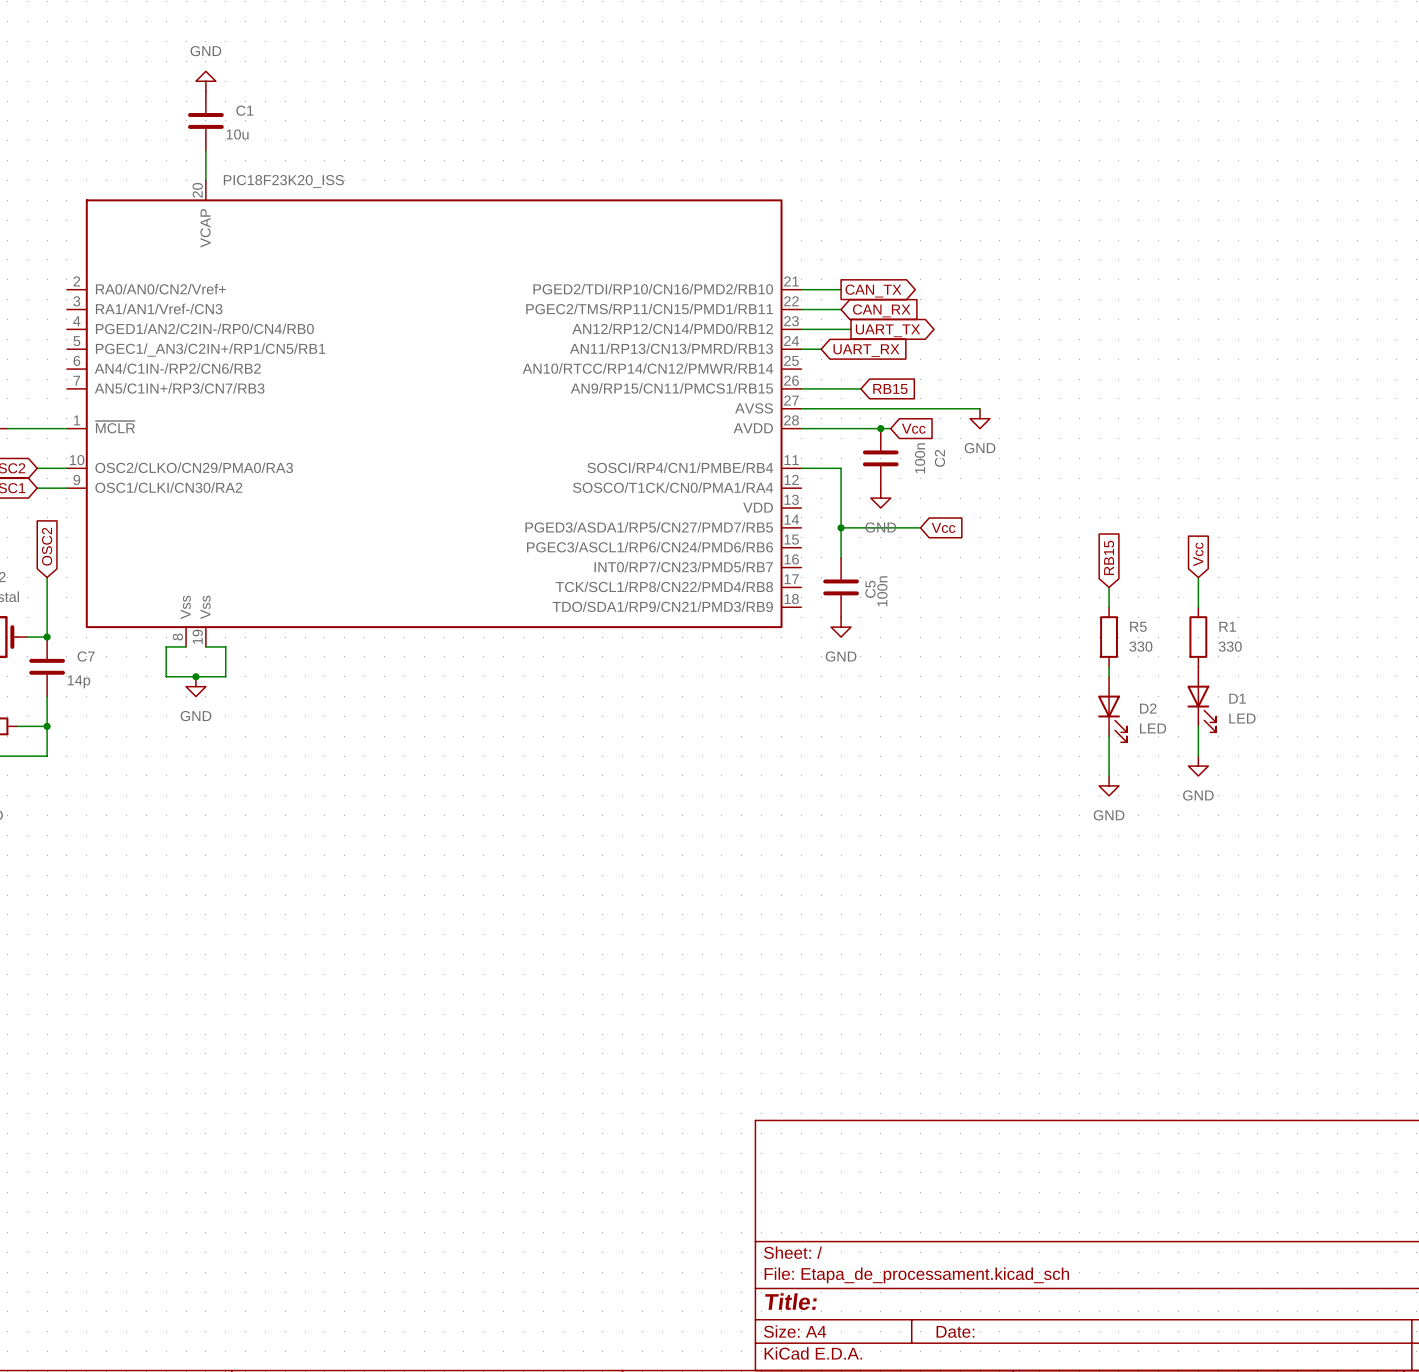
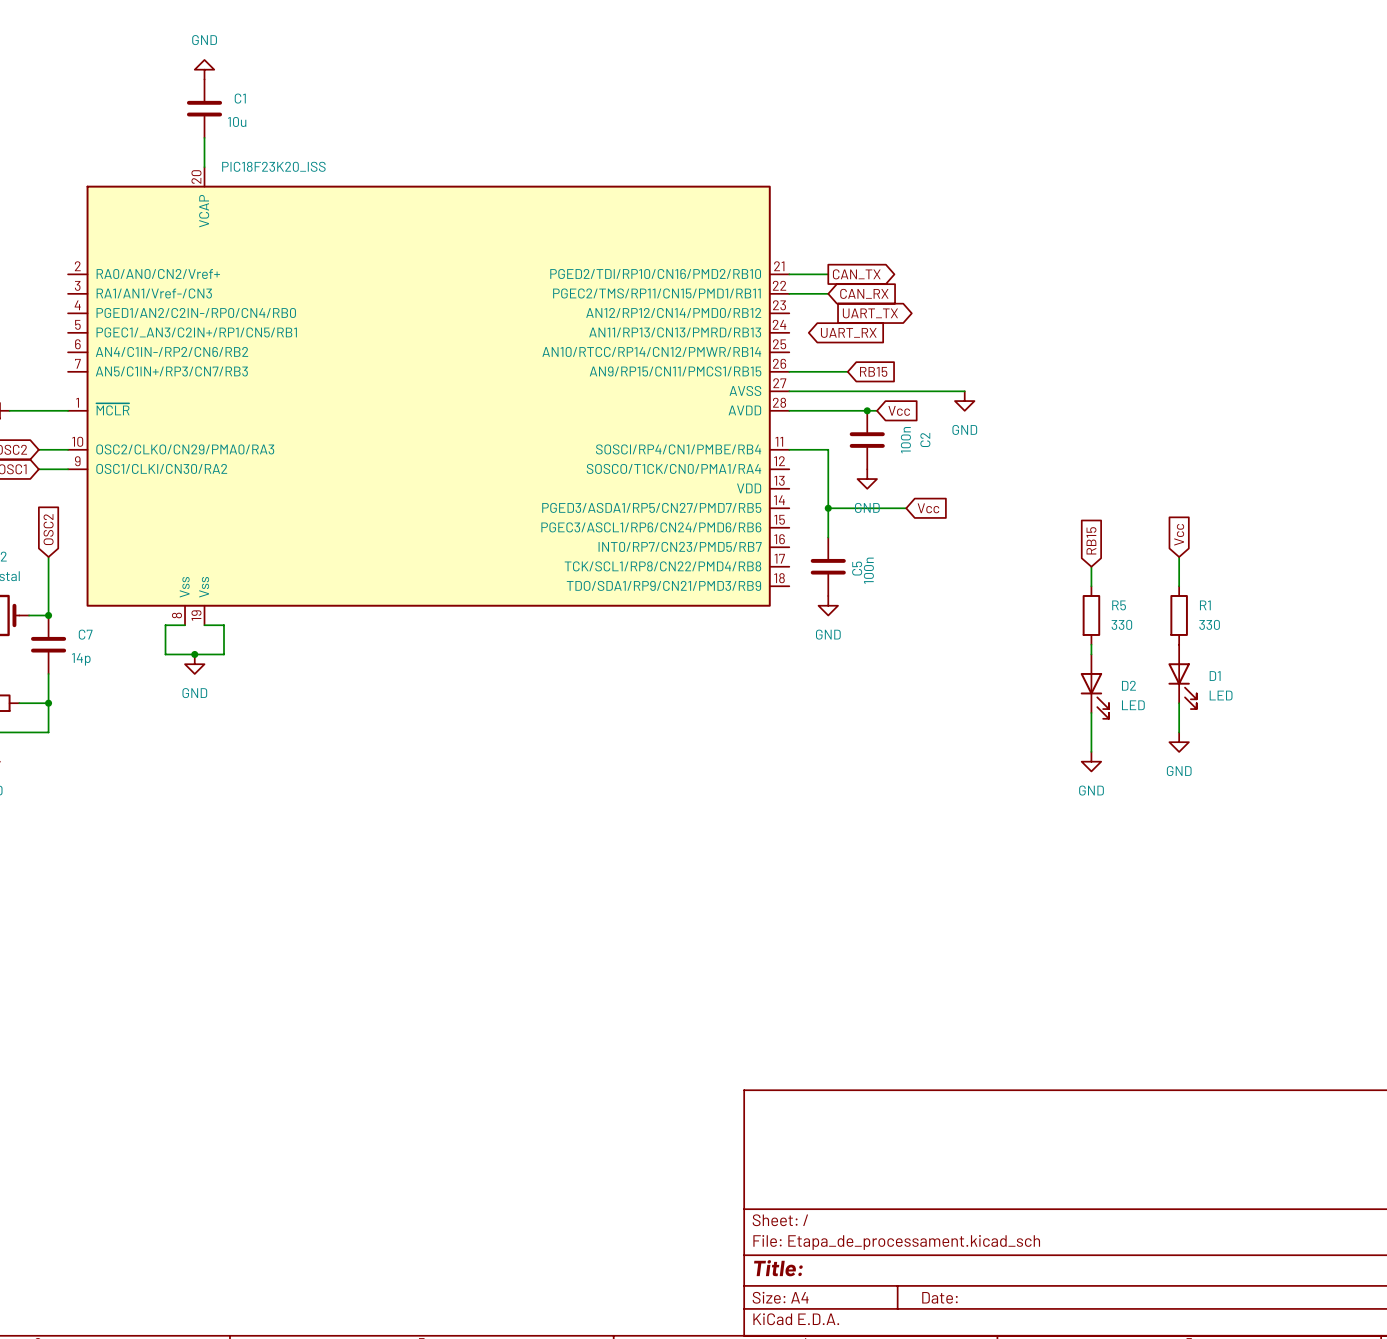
wire: (801, 329) (851, 329) -> none
wire: (801, 349) (821, 349) -> none

